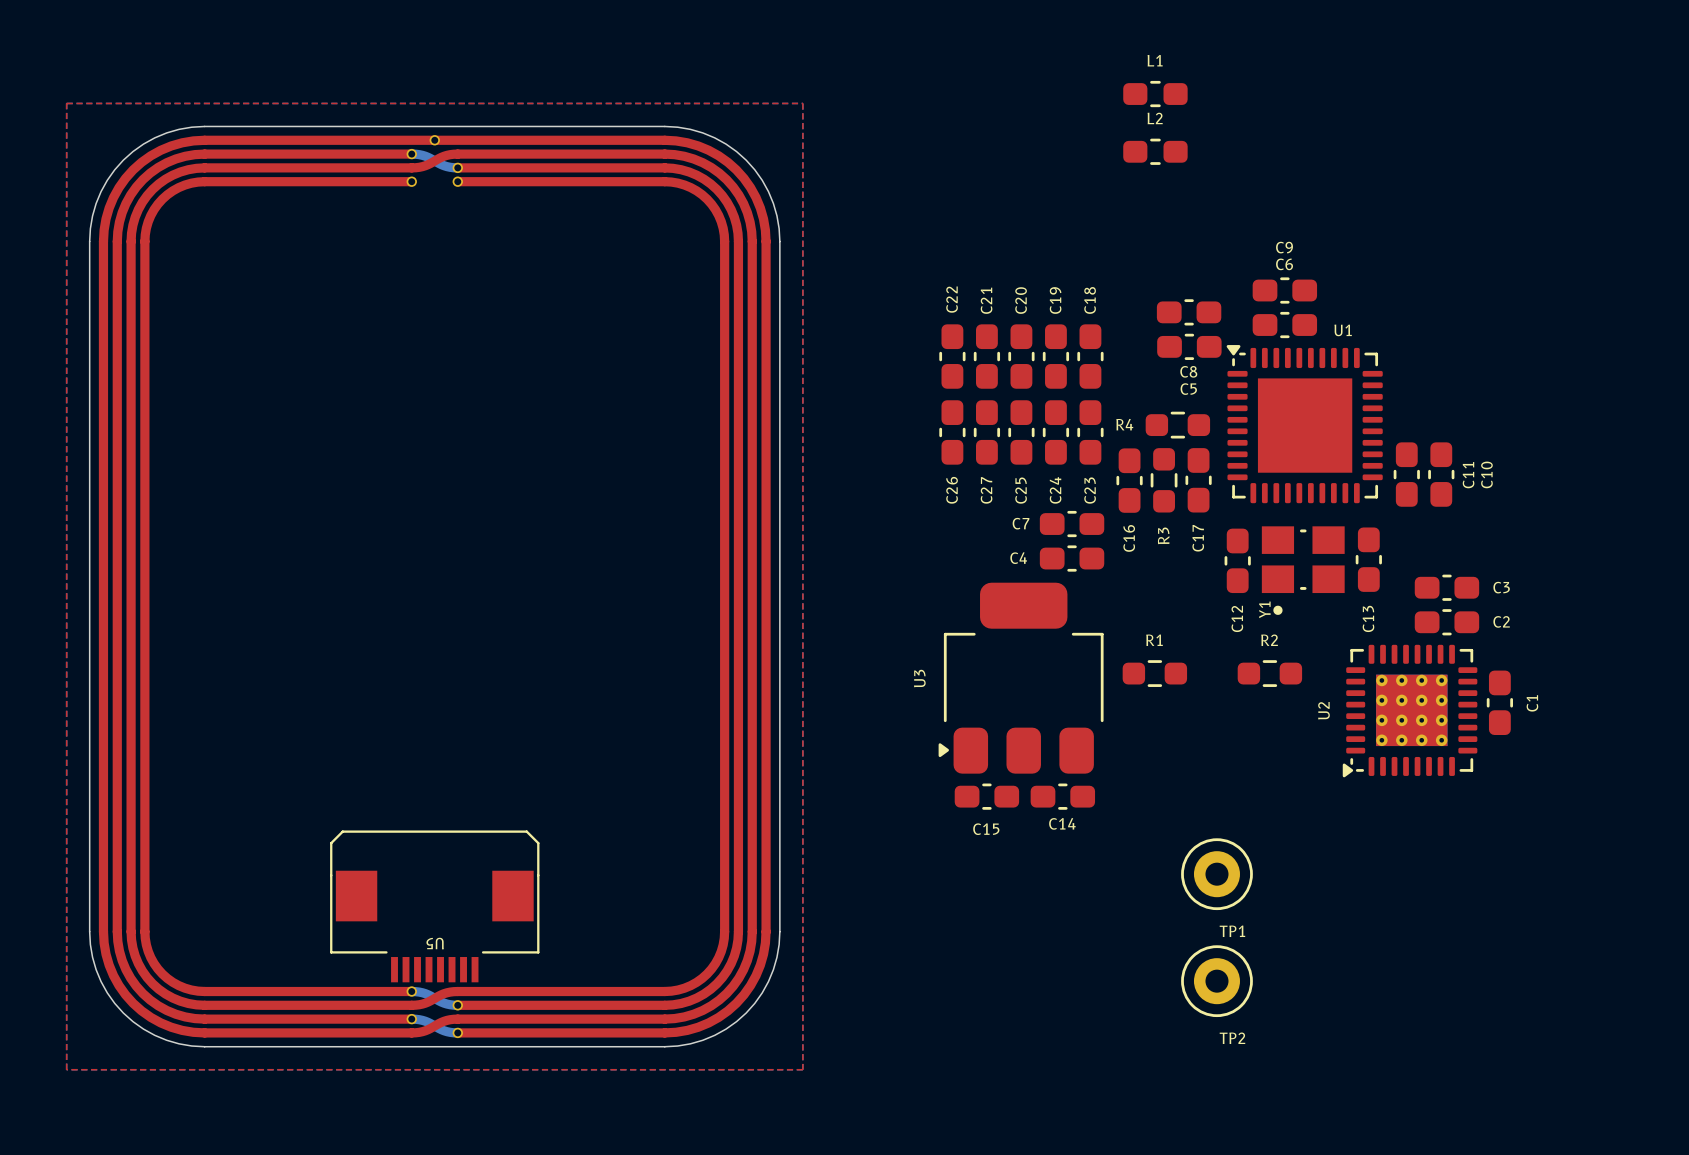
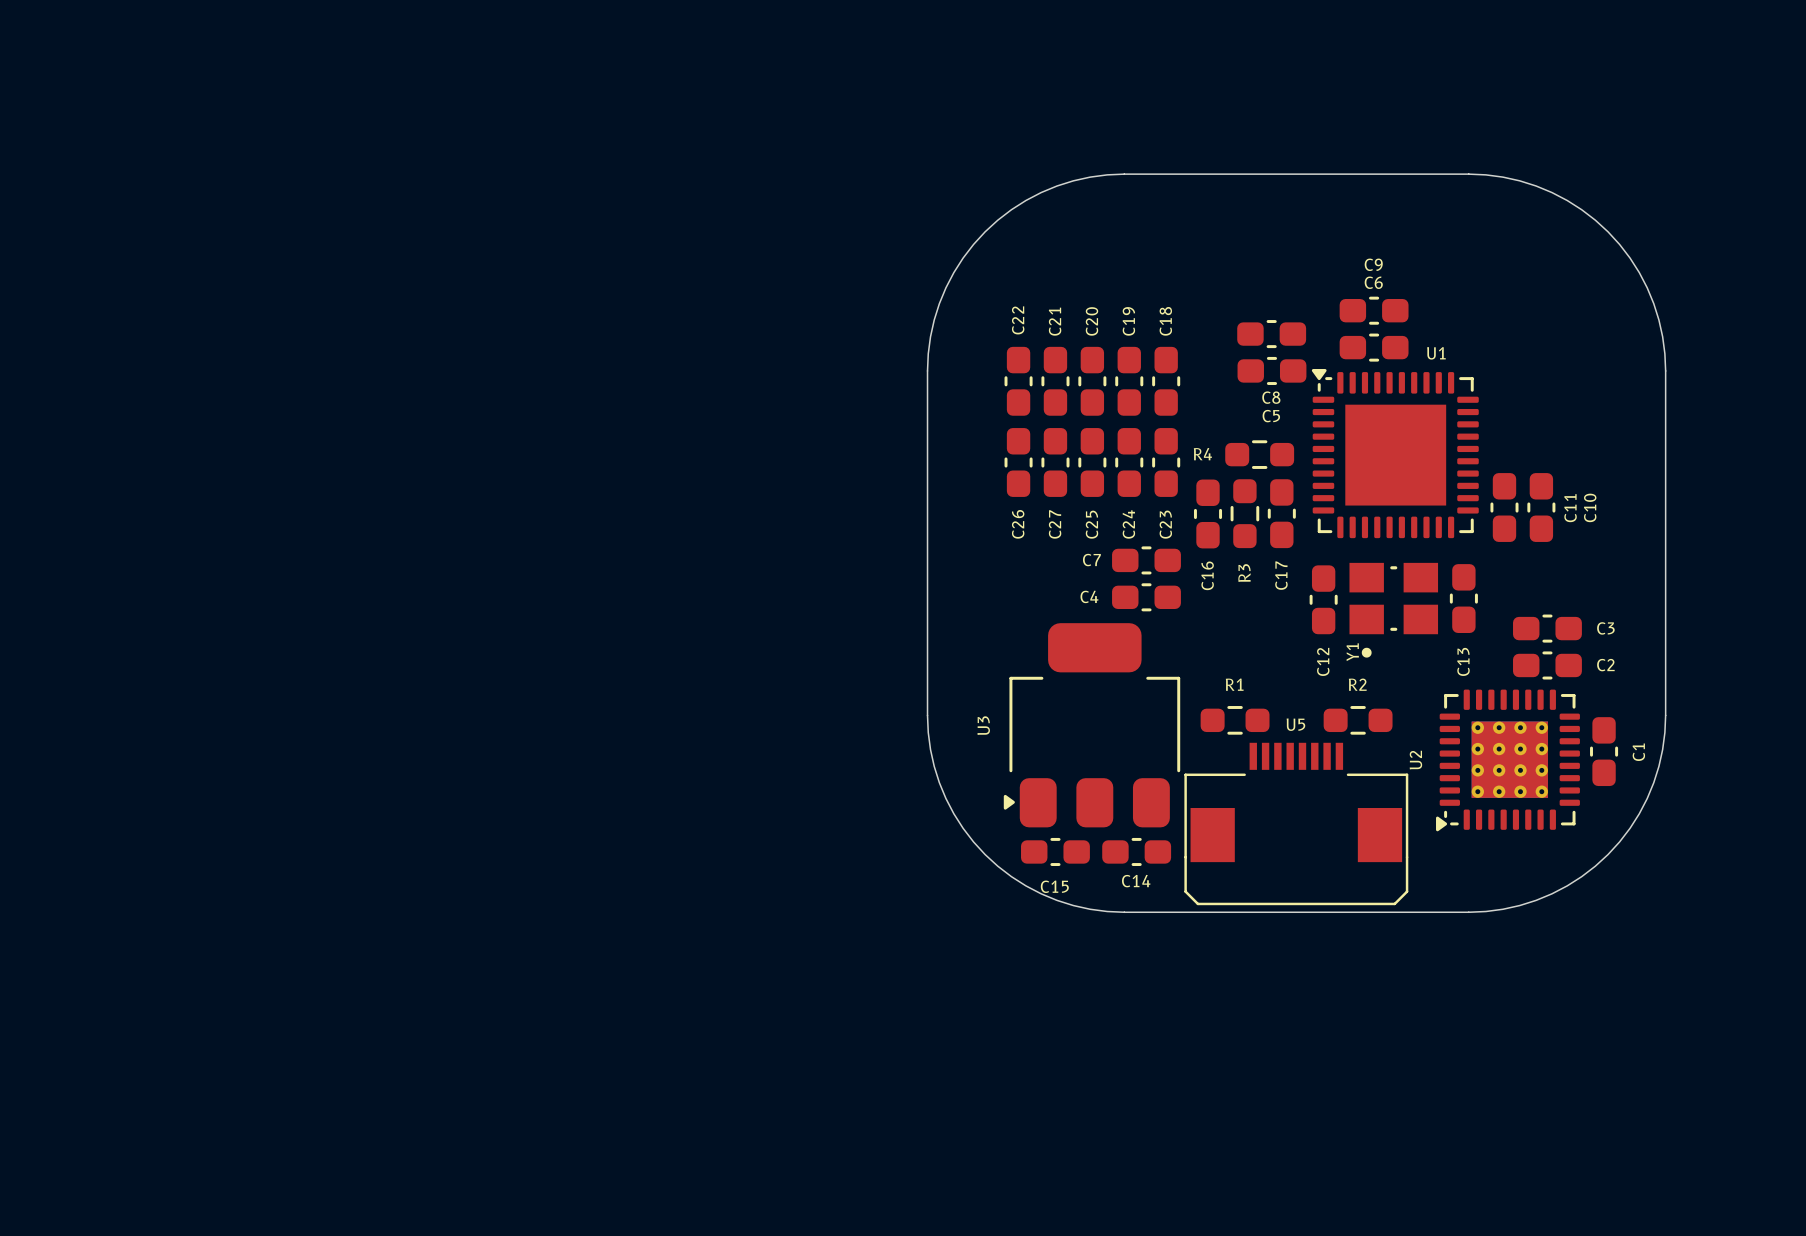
L1: (1155, 94) -> none
top zone outline: (66, 103) (802, 103) (802, 1069) (66, 1069) (66, 103) -> none
board edge: (204, 126) (677, 127) (702, 132) (726, 144) (746, 160) (762, 180) (773, 203) (779, 241) (779, 931) (773, 969) (762, 992) (746, 1013) (726, 1029) (702, 1040) (664, 1046) (191, 1046) (166, 1040) (143, 1029) (123, 1013) (107, 992) (96, 969) (89, 931) (90, 228) (96, 203) (107, 180) (132, 151) (166, 132) (204, 126) -> none
L2: (1155, 151) -> none
board edge: none -> (1124, 174) (1468, 174) (1502, 177) (1551, 192) (1581, 209) (1607, 231) (1639, 272) (1653, 303) (1664, 353) (1664, 732) (1658, 766) (1639, 813) (1607, 854) (1567, 885) (1536, 900) (1485, 911) (1107, 911) (1057, 900) (1025, 885) (985, 854) (953, 813) (934, 766) (927, 715) (927, 370) (934, 320) (953, 272) (973, 244) (997, 220) (1025, 200) (1057, 186) (1090, 177) (1124, 174)
part: (434, 586) -> none
TP1: (1216, 874) -> none
U5 rotation: 0° (434, 906) -> 180° (1296, 823)
U5 position: (434, 906) -> (1296, 823)
U5 name position: U5 (435, 943) -> U5 (1295, 724)
TP2: (1216, 981) -> none

